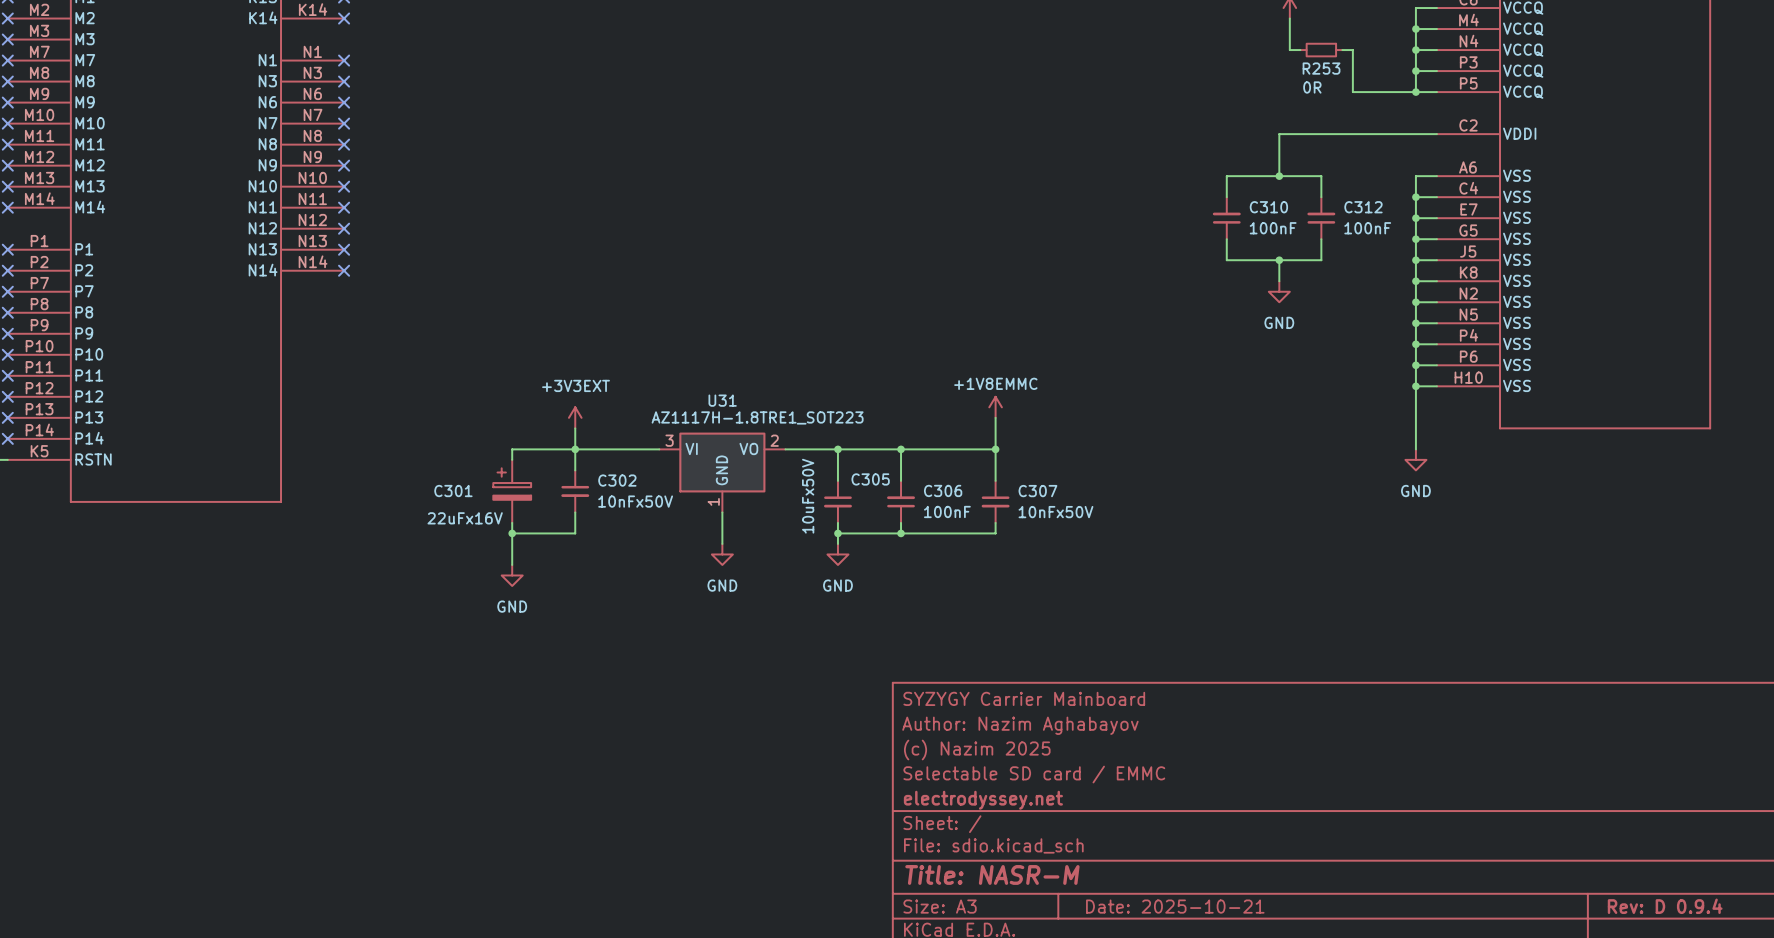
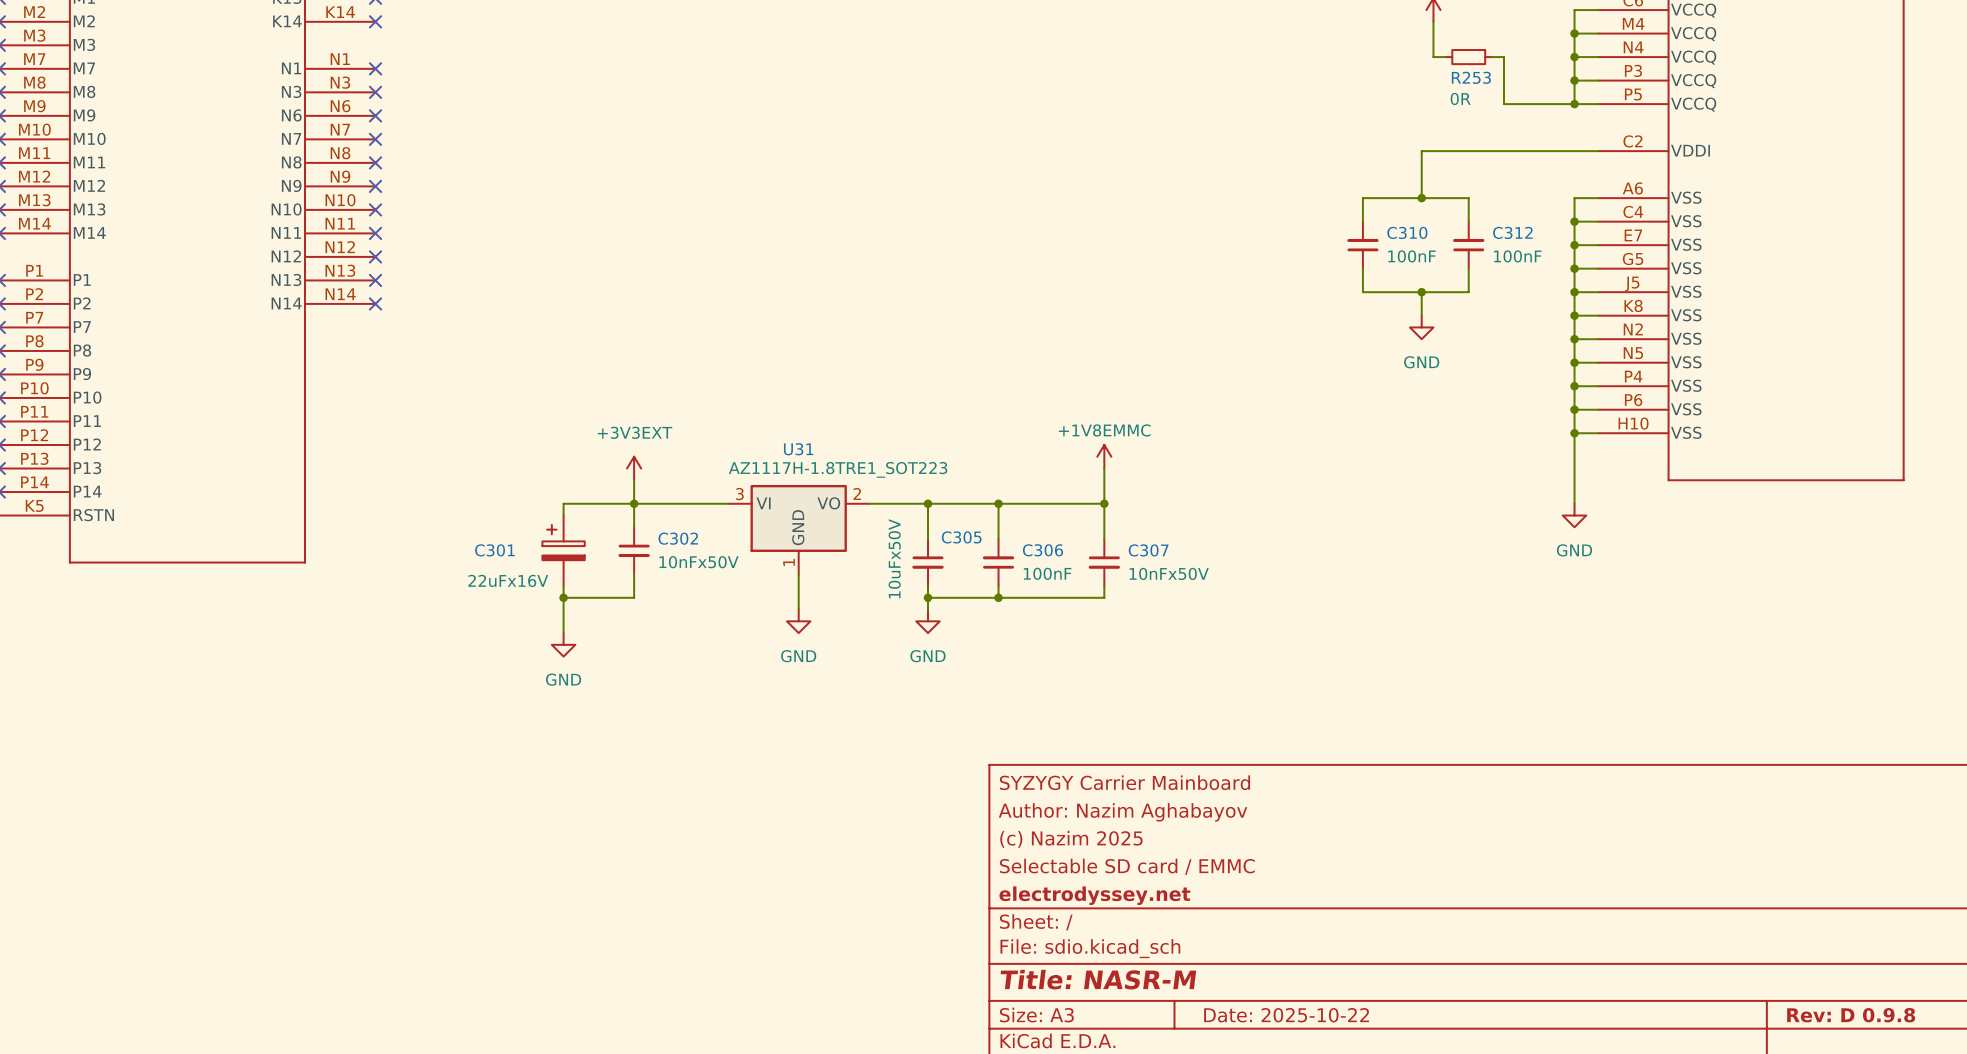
title block: Date: 2025-10-21 (1175, 906) -> Date: 2025-10-22 (1286, 1015)
title block: Rev: D 0.9.4 (1665, 906) -> Rev: D 0.9.8 (1851, 1015)

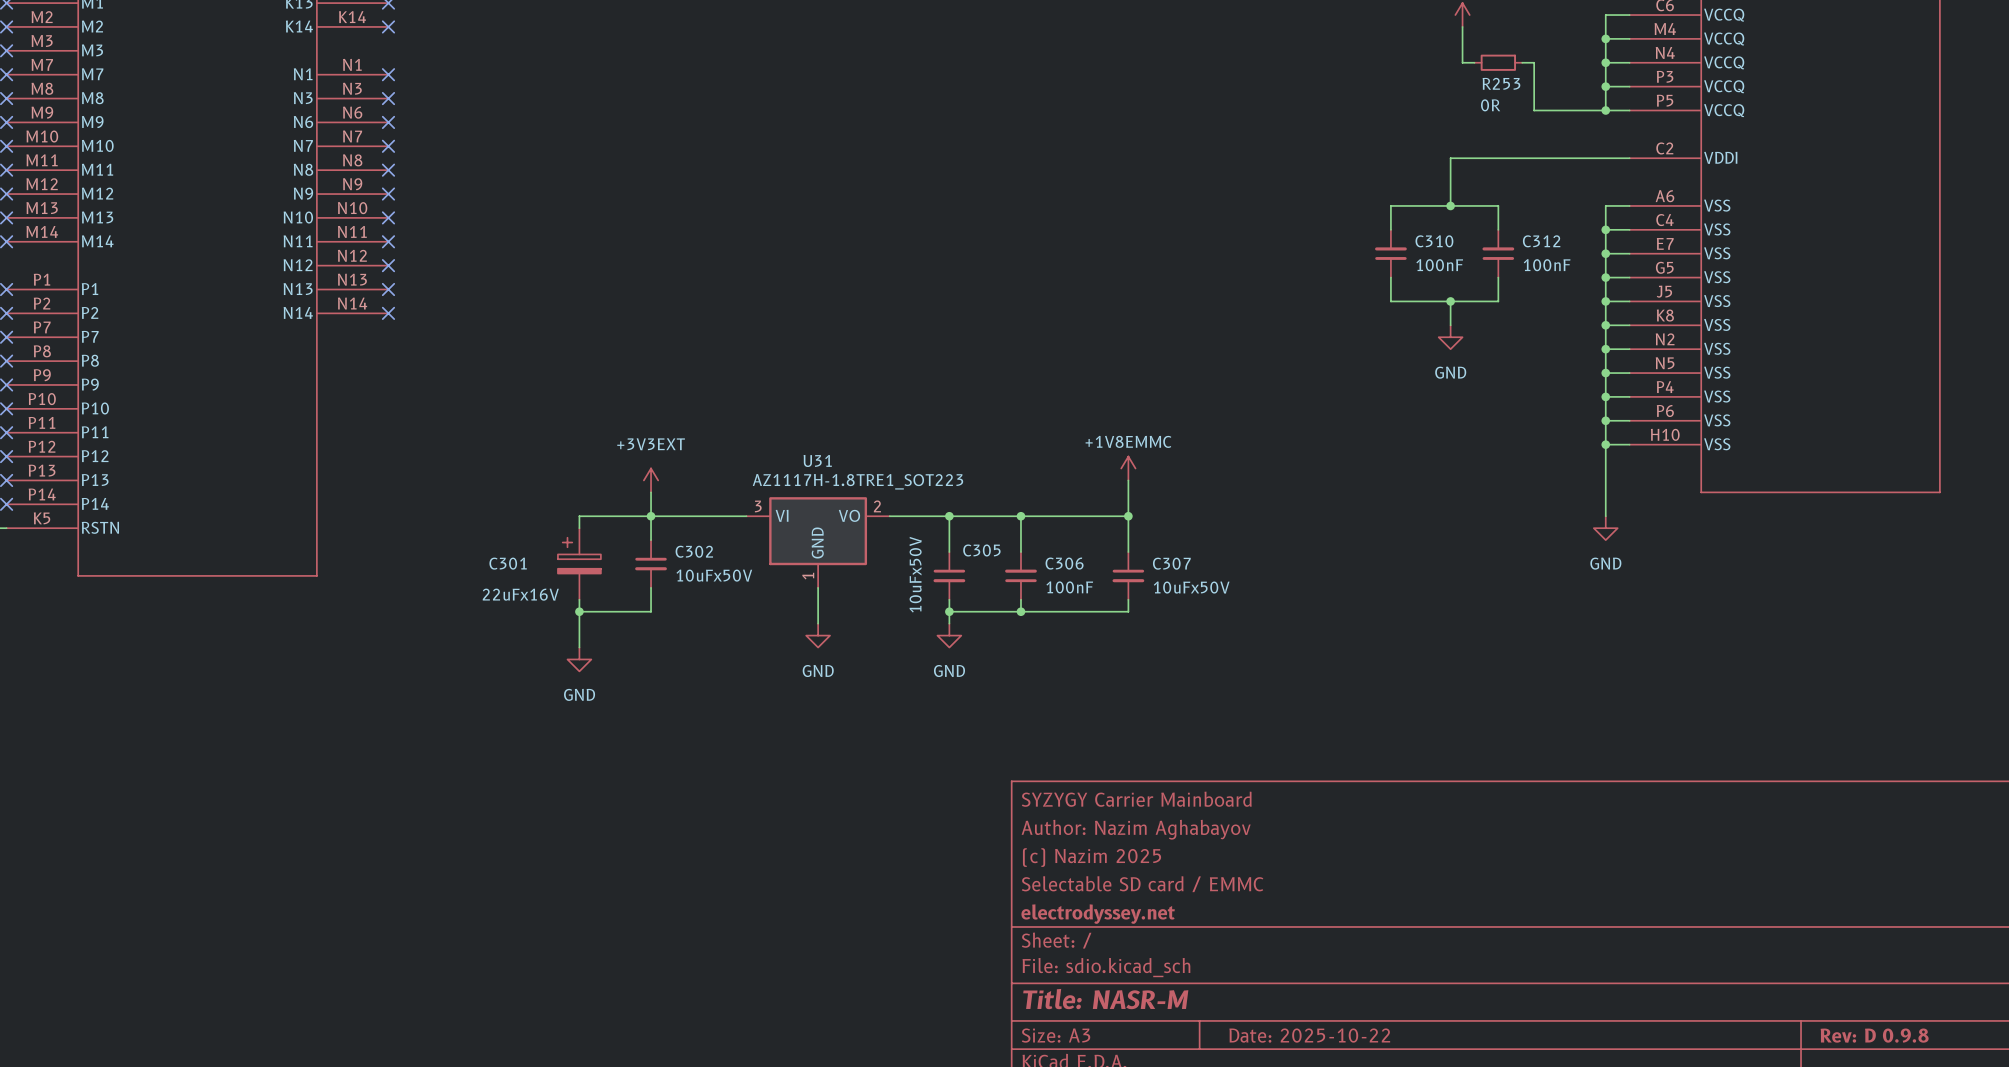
C302 value: 10nFx50V (699, 562) -> 10uFx50V (714, 575)
C307 value: 10nFx50V (1169, 573) -> 10uFx50V (1191, 587)

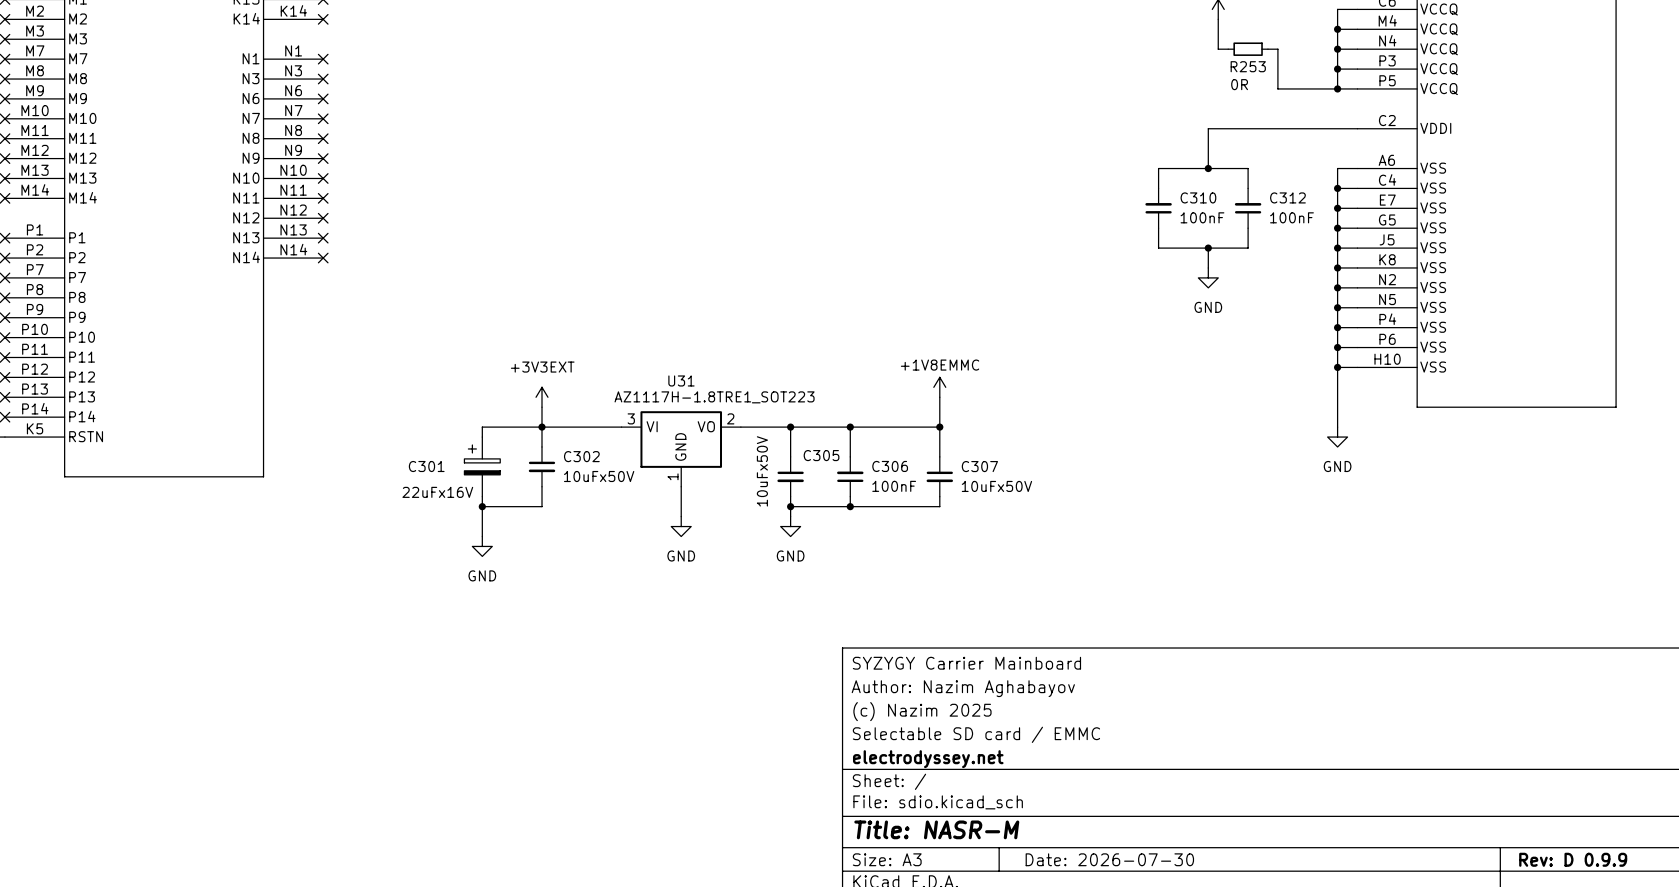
title block: Date: 2025-10-22 (1309, 1035) -> Date: 2026-07-30 (1109, 859)
title block: Rev: D 0.9.8 (1874, 1035) -> Rev: D 0.9.9 (1573, 859)

